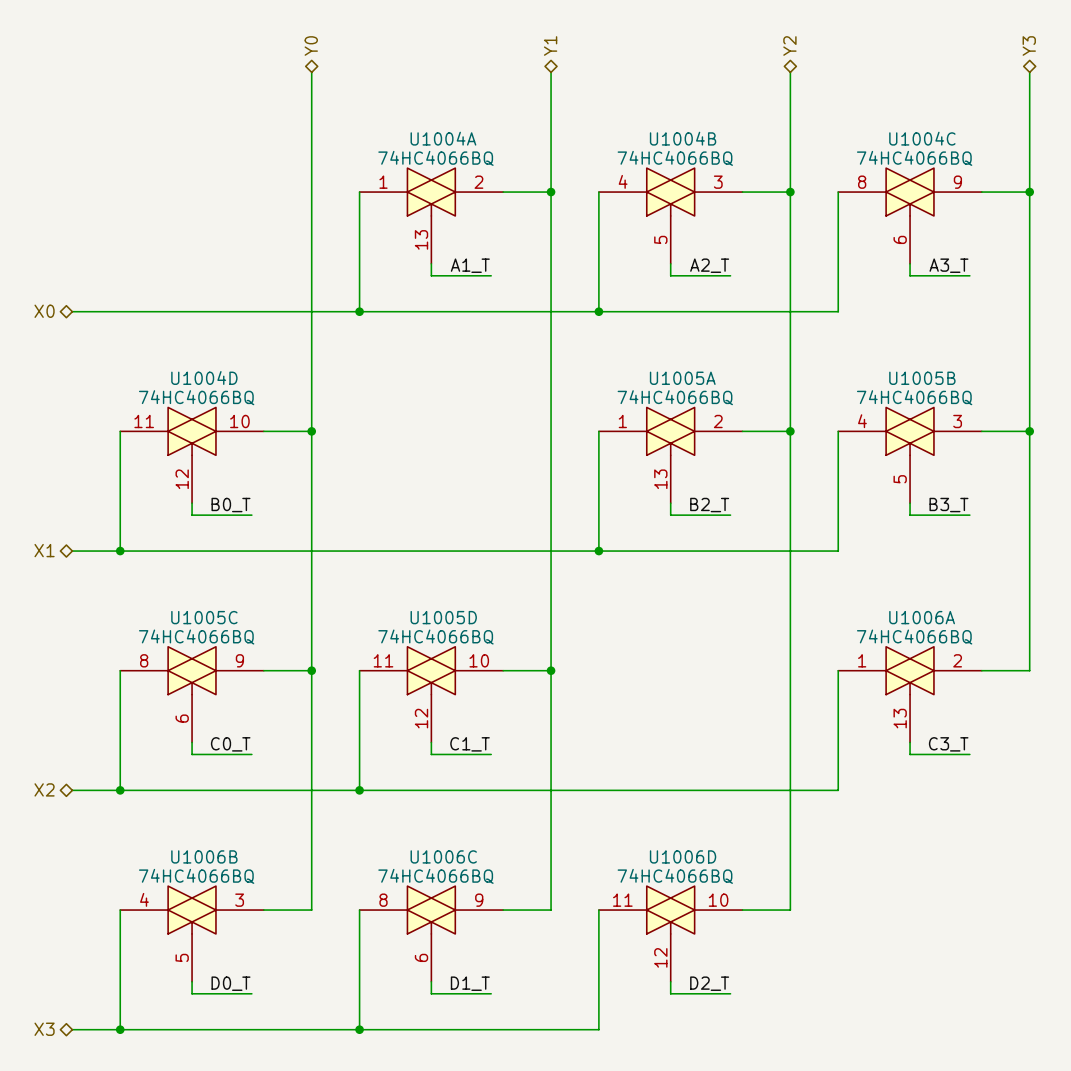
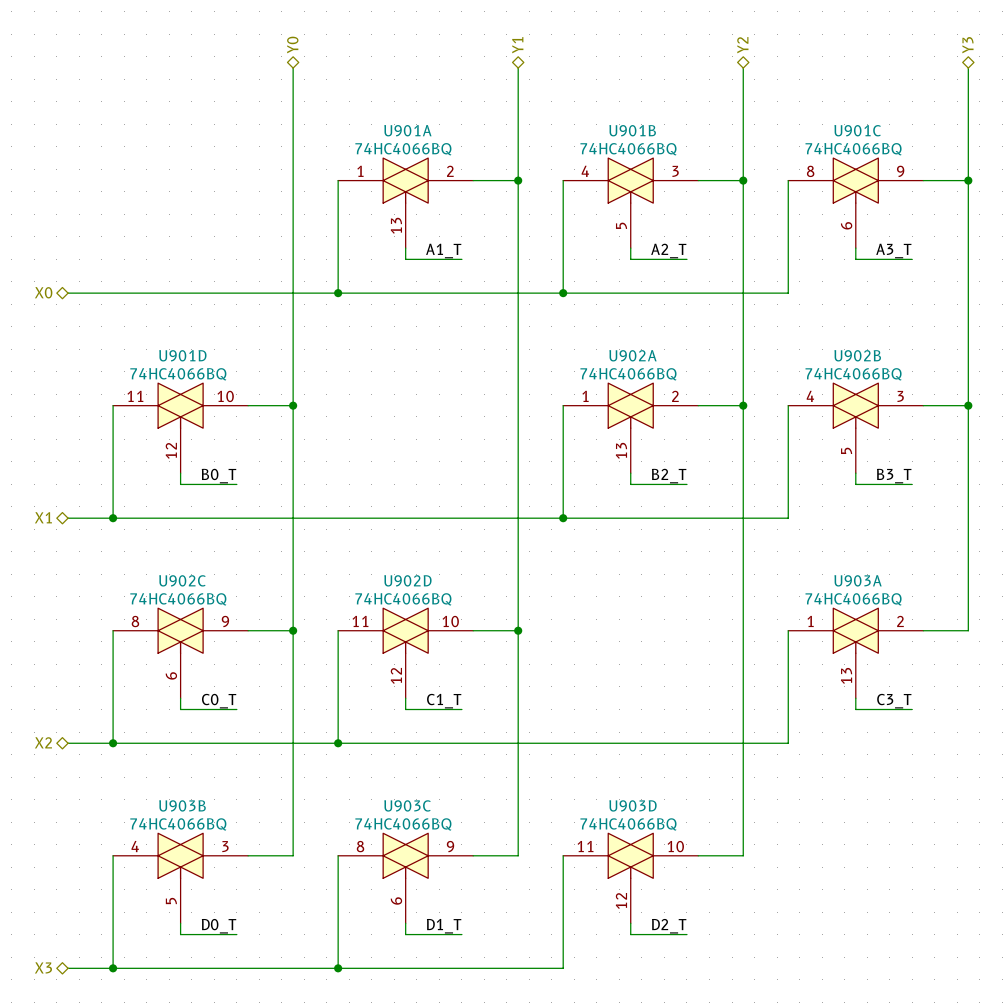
U1004A name: U1004A (443, 138) -> U901A (407, 130)
U1004B name: U1004B (683, 138) -> U901B (632, 130)
U1004C name: U1004C (922, 138) -> U901C (857, 130)
U1004D name: U1004D (204, 377) -> U901D (182, 355)
U1005A name: U1005A (682, 378) -> U902A (632, 355)
U1005B name: U1005B (922, 378) -> U902B (857, 355)
U1005C name: U1005C (204, 617) -> U902C (182, 580)
U1005D name: U1005D (443, 617) -> U902D (407, 580)
U1006A name: U1006A (922, 617) -> U903A (858, 580)
U1006B name: U1006B (204, 856) -> U903B (182, 805)
U1006C name: U1006C (443, 856) -> U903C (407, 805)
U1006D name: U1006D (683, 856) -> U903D (632, 805)

